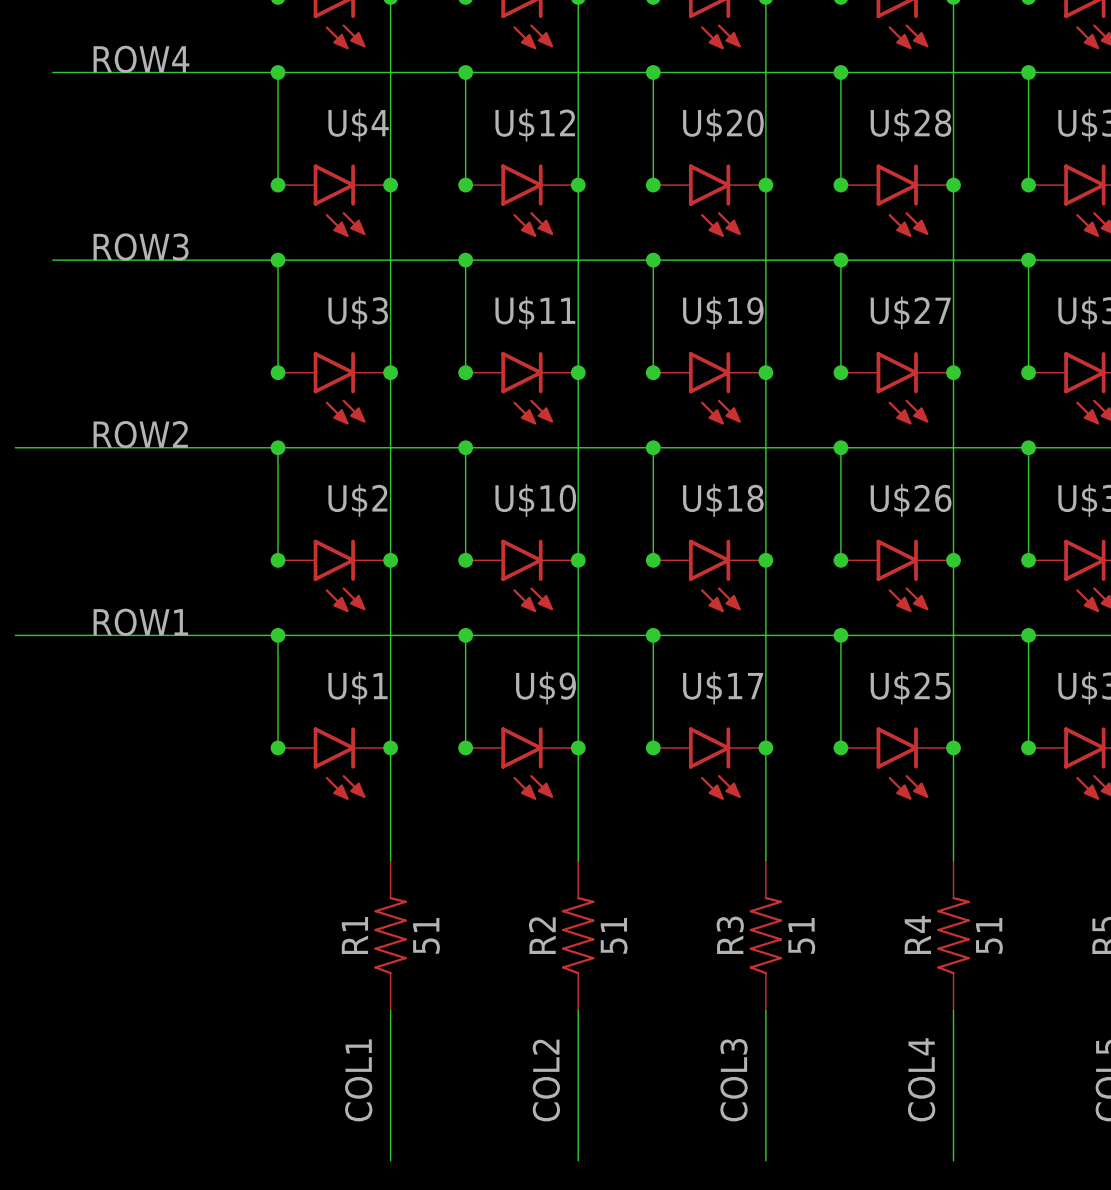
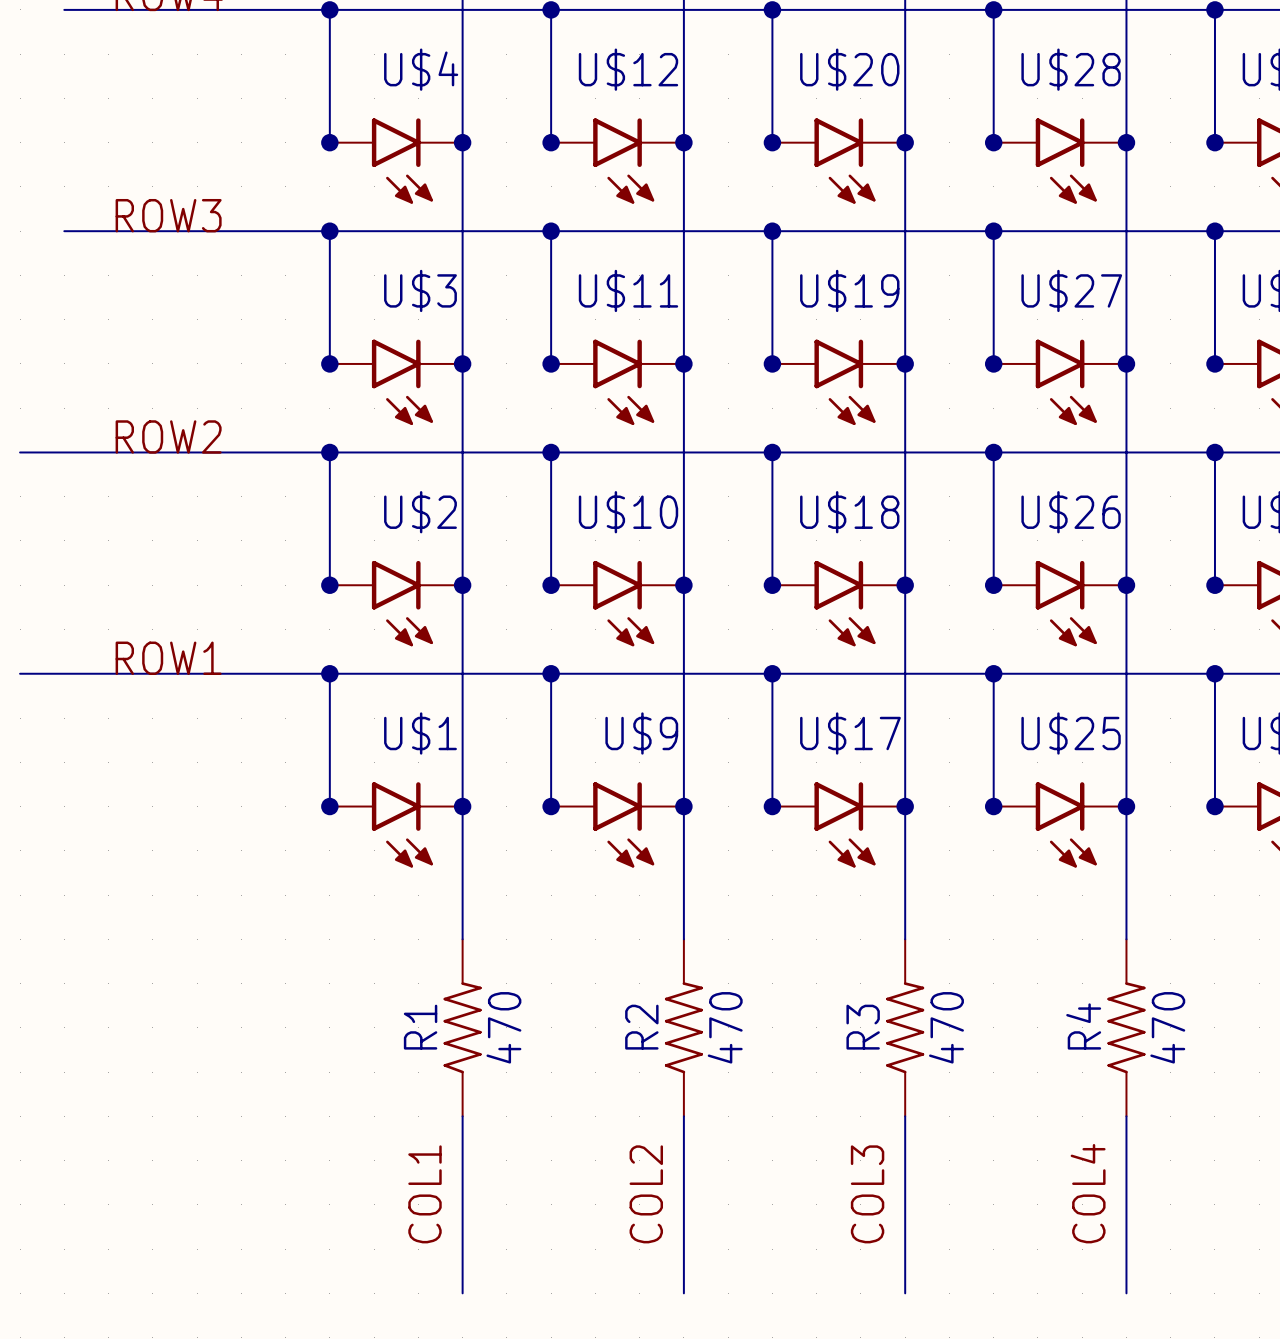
R1 value: 51 (426, 935) -> 470 (503, 1027)
R2 value: 51 (614, 935) -> 470 (725, 1027)
R3 value: 51 (801, 935) -> 470 (946, 1027)
R4 value: 51 (989, 935) -> 470 (1167, 1027)

